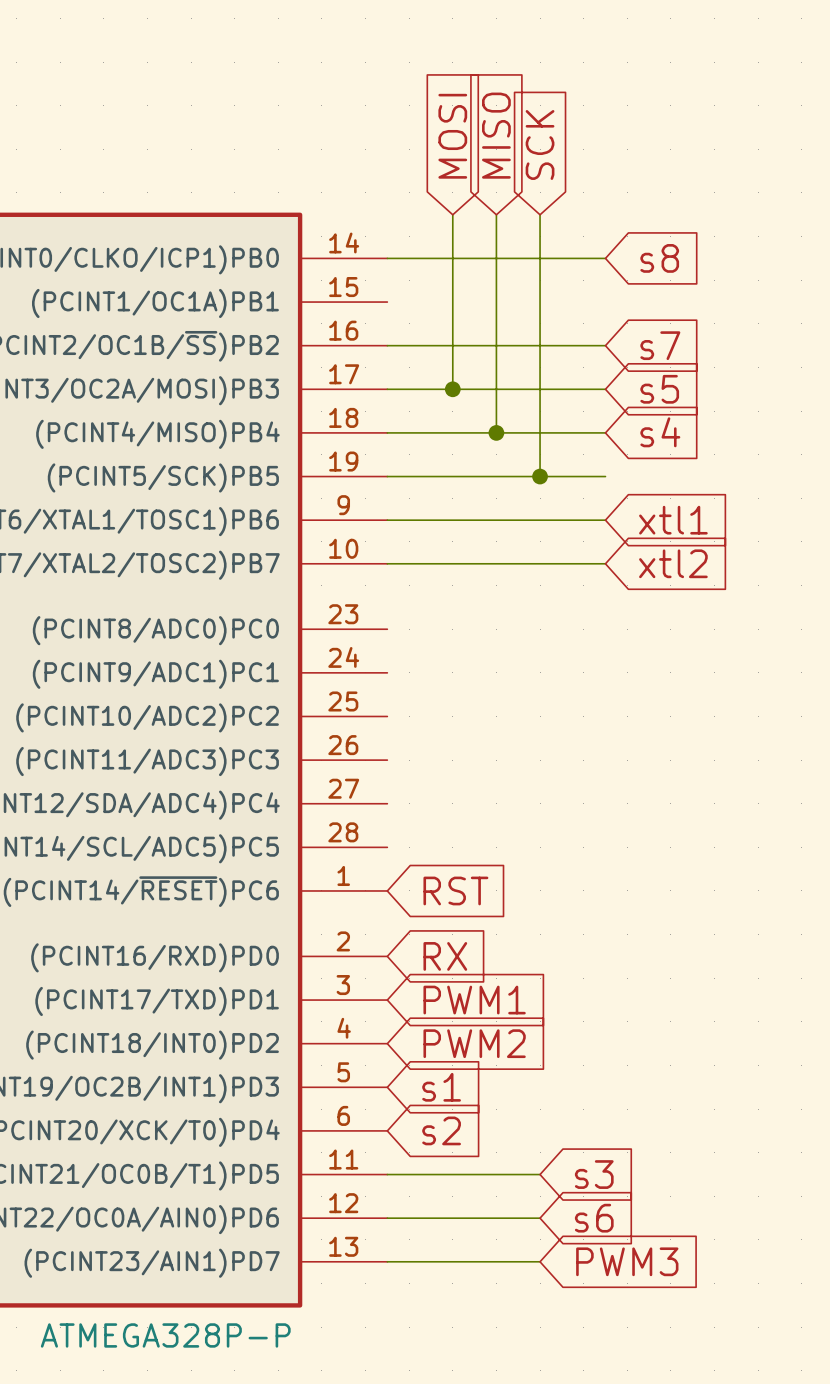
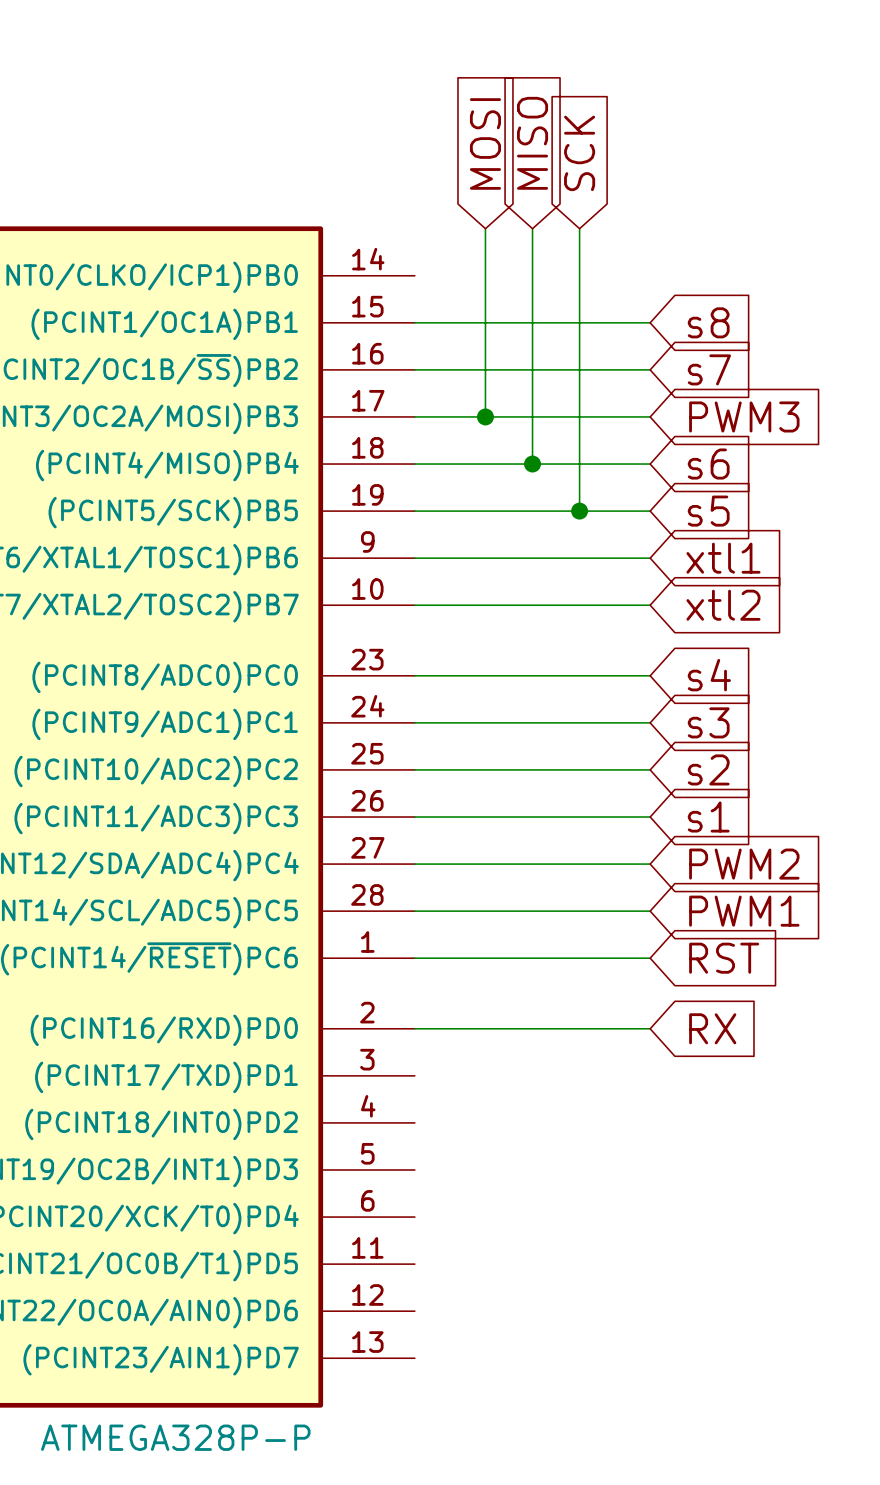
wire: (387, 258) (605, 258) -> (414, 322) (650, 322)
global label position: s8 (659, 258) -> s8 (708, 322)
global label: s5 (659, 389) -> PWM3 (744, 416)
global label: s4 (660, 432) -> s6 (708, 464)
global label: none -> s5 (708, 511)
global label: none -> s4 (709, 675)
wire: none -> (414, 675) (650, 675)
wire: none -> (414, 722) (650, 722)
global label: none -> s3 (708, 722)
wire: none -> (414, 769) (650, 769)
global label: none -> s2 (708, 769)
wire: none -> (414, 817) (650, 817)
wire: none -> (414, 864) (650, 864)
wire: none -> (414, 911) (650, 911)
wire: none -> (414, 958) (650, 958)
global label position: RST (455, 890) -> RST (724, 958)
wire: none -> (414, 1028) (650, 1028)
global label position: RX (445, 956) -> RX (712, 1028)
global label position: PWM1 (474, 1000) -> PWM1 (744, 911)
global label position: PWM2 (474, 1043) -> PWM2 (744, 864)
global label position: s1 (441, 1087) -> s1 (708, 817)
global label: s2 (441, 1130) -> none
wire: (387, 1174) (540, 1174) -> none
global label: s3 (594, 1174) -> none
wire: (387, 1218) (540, 1218) -> none
global label: s6 (594, 1218) -> none
wire: (387, 1261) (540, 1261) -> none
global label: PWM3 (627, 1261) -> none

